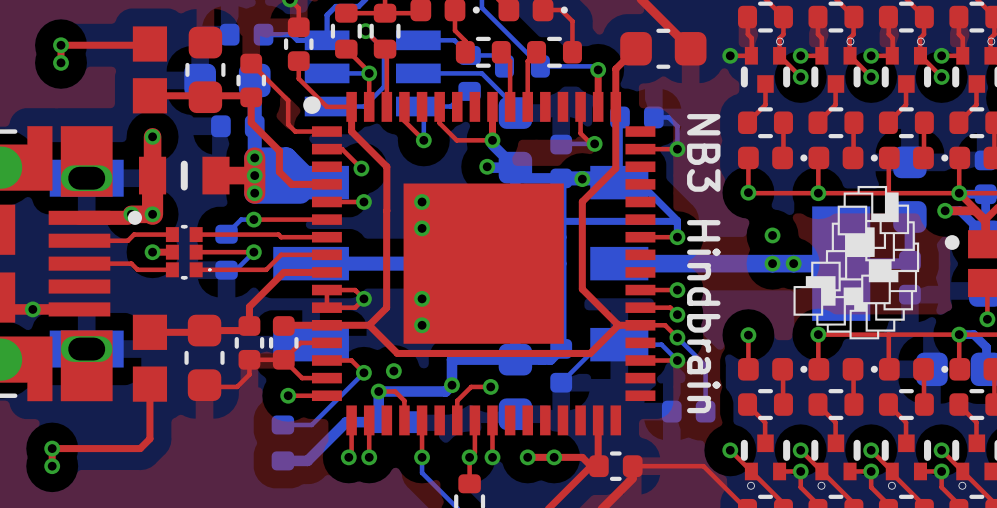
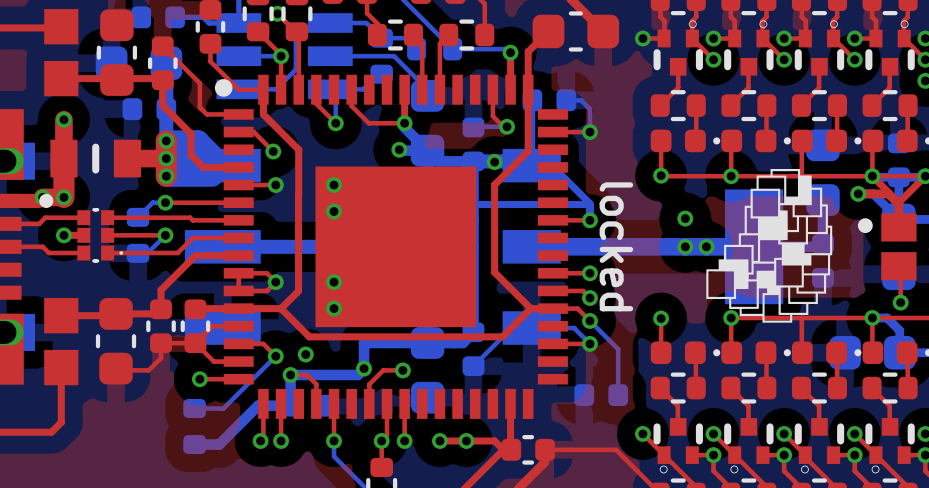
text: NB3 Hindbrain (703, 263) -> locked (616, 246)

